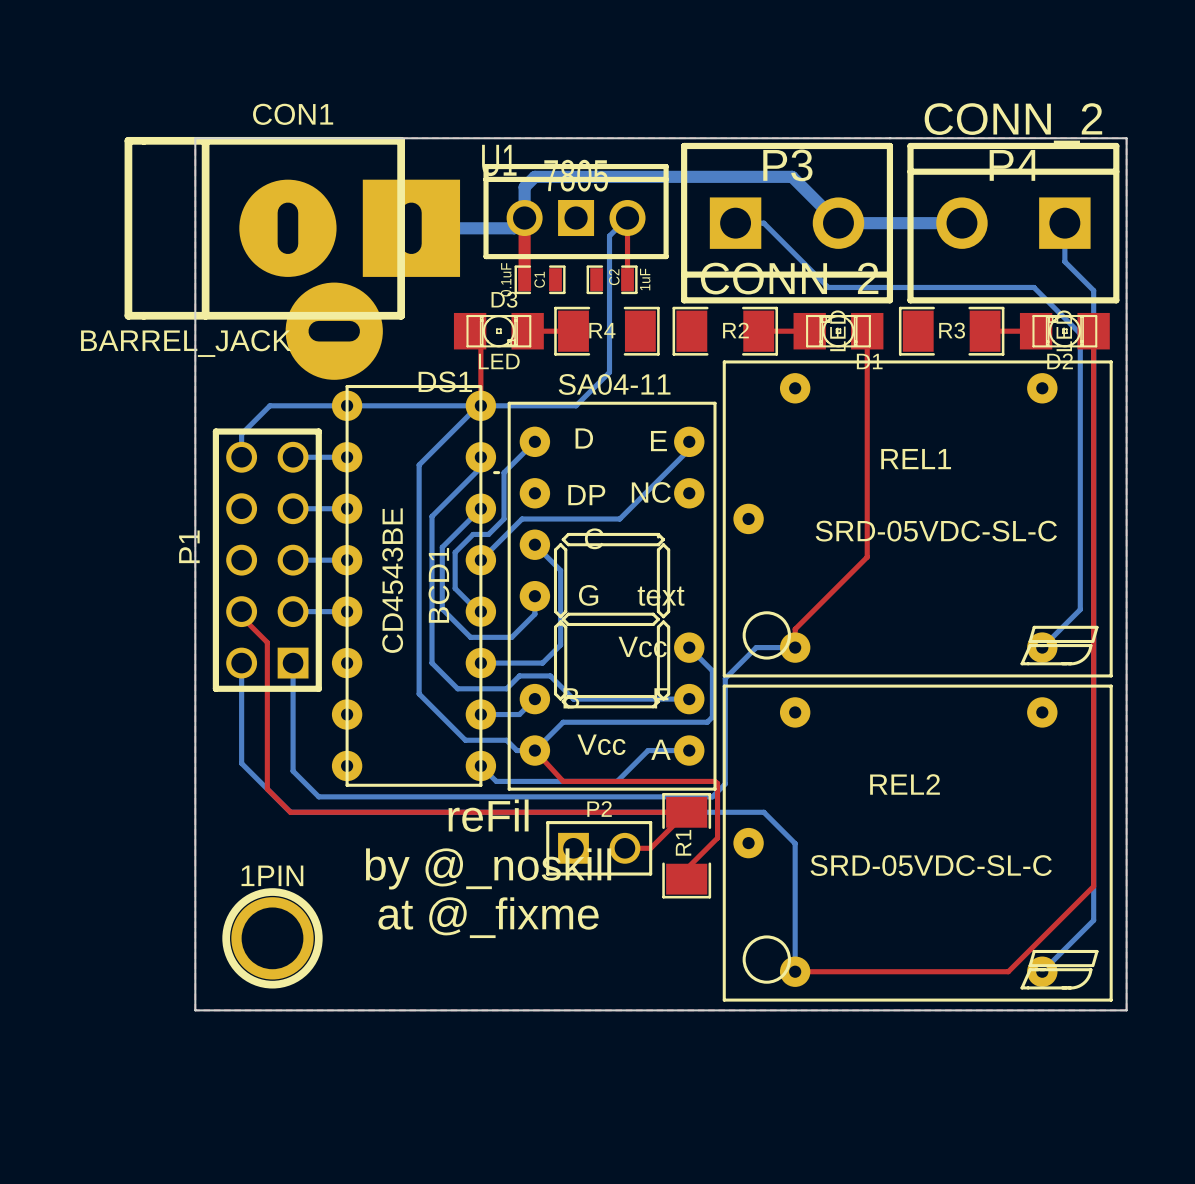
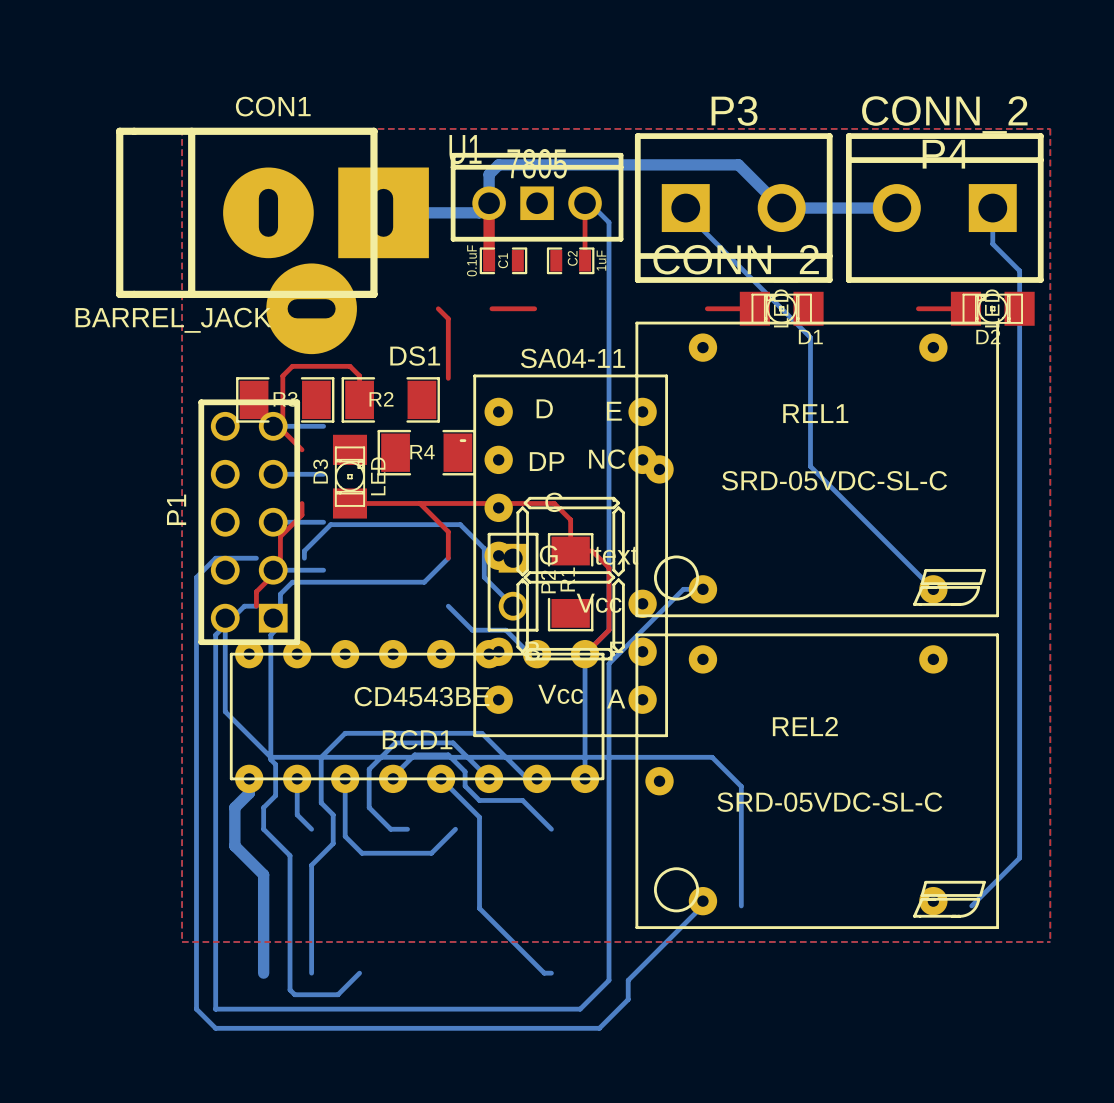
board edge: (195, 138) (1126, 138) (1126, 1010) (195, 1010) (195, 138) -> none
P3 name position: P3 (787, 165) -> P3 (734, 111)
bottom track: (627, 218) (609, 236) (609, 372) (576, 405) (269, 405) (241, 434) (241, 457) -> (585, 203) (589, 203) (609, 222) (609, 630) (585, 654) (585, 778)
bottom track: (735, 223) (763, 223) (828, 287) (1034, 287) (1080, 333) (1080, 609) (1042, 647) -> (685, 208) (685, 212) (810, 337) (810, 466) (933, 589)
R2 name position: R2 (735, 330) -> R2 (381, 399)
D3 rotation: 0° (498, 331) -> 90° counterclockwise (349, 476)
D3 position: (498, 331) -> (349, 476)
R4 position: (606, 331) -> (426, 452)
R2 position: (725, 331) -> (390, 399)
top track: (867, 331) (867, 557) (795, 629) (795, 647) -> none
R3 position: (951, 331) -> (285, 399)
top track: (1093, 331) (1093, 886) (1008, 971) (795, 971) -> none
bottom track: (478, 405) (419, 464) (419, 693) (465, 740) (506, 740) (516, 750) (534, 750) (563, 722) (707, 722) (712, 717) (712, 670) (689, 647) -> none
top track: none -> (359, 399) (359, 375) (349, 366) (292, 366) (282, 375) (282, 430) (302, 449)
bottom track: (534, 441) (504, 472) (504, 519) (488, 534) (473, 534) (455, 552) (455, 588) (478, 611) (480, 611) -> none
bottom track: (689, 441) (689, 449) (619, 519) (522, 519) (480, 560) -> none
bottom track: (480, 457) (480, 467) (432, 516) (432, 663) (457, 688) (506, 688) (519, 675) -> (448, 606) (472, 630) (484, 630)
bottom track: (480, 508) (442, 547) (442, 609) (470, 637) (511, 637) (534, 614) (534, 596) -> none
REL1 position: (917, 518) -> (817, 469)
top track: none -> (302, 503) (302, 515) (280, 536) (280, 567) (256, 591) (256, 606)
top track: none -> (349, 503) (554, 503) (570, 519) (570, 551) (592, 551) (609, 567) (609, 630) (585, 654)
top track: none -> (419, 503) (448, 531) (448, 558)
bottom track: (534, 544) (560, 570) (560, 645) (542, 663) (480, 663) -> none
BCD1 rotation: 0° (413, 585) -> 90° clockwise (417, 716)
bottom track: none -> (256, 558) (215, 558) (196, 577) (196, 1009) (215, 1028) (599, 1028) (628, 999) (628, 980) (702, 905) (702, 901)
bottom track: none -> (304, 558) (304, 551) (330, 524) (460, 524) (484, 548) (484, 577) (513, 606)
bottom track: none -> (448, 558) (424, 582) (292, 582) (280, 594) (280, 625) (270, 634) (270, 759) (275, 764) (275, 795) (263, 807) (263, 829) (290, 855) (290, 989) (294, 994) (337, 994) (359, 973)
top track: (241, 611) (241, 616) (267, 642) (267, 789) (290, 812) (686, 812) (650, 848) (624, 848) -> none
bottom track: none -> (702, 589) (683, 589) (609, 663) (609, 980) (580, 1009) (215, 1009) (215, 634) (244, 606) (256, 606)
bottom track: (795, 647) (756, 647) (725, 678) (725, 783) (712, 796) (486, 796) -> (489, 778) (453, 742)
bottom track: (293, 663) (293, 771) (318, 796) (424, 796) -> (407, 829) (390, 829) (369, 807) (369, 769) (395, 742)
bottom track: (542, 675) (550, 675) (573, 699) (689, 699) -> (505, 630) (529, 654) (537, 654)
bottom track: (534, 699) (519, 714) (480, 714) -> none
top track: (534, 750) (563, 781) (714, 781) (717, 783) (717, 838) (686, 868) (686, 879) -> none
bottom track: (689, 750) (648, 750) (617, 781) (496, 781) (480, 765) -> none
text: reFil (488, 815) -> none
bottom track: none -> (249, 778) (249, 793) (234, 807) (234, 846) (263, 874) (263, 973)
bottom track: none -> (297, 778) (297, 814) (311, 829)
bottom track: none -> (345, 778) (345, 836) (361, 853) (431, 853) (455, 829)
bottom track: none -> (393, 778) (393, 776) (414, 754) (448, 754) (465, 771) (465, 786) (479, 800) (522, 800) (551, 829)
bottom track: none -> (441, 778) (479, 817) (479, 908) (544, 973) (551, 973)
bottom track: none -> (537, 778) (527, 778) (481, 733) (345, 733) (321, 757) (321, 802) (333, 814) (333, 843) (311, 865) (311, 973)
REL2 position: (917, 843) -> (817, 781)
R1 position: (686, 845) -> (570, 582)
P2 rotation: 0° (599, 848) -> 90° clockwise (513, 582)
P2 position: (599, 848) -> (513, 582)
text: by @_noskill (488, 868) -> none
text: at @_fixme (488, 917) -> none
1PIN: (272, 938) -> none

